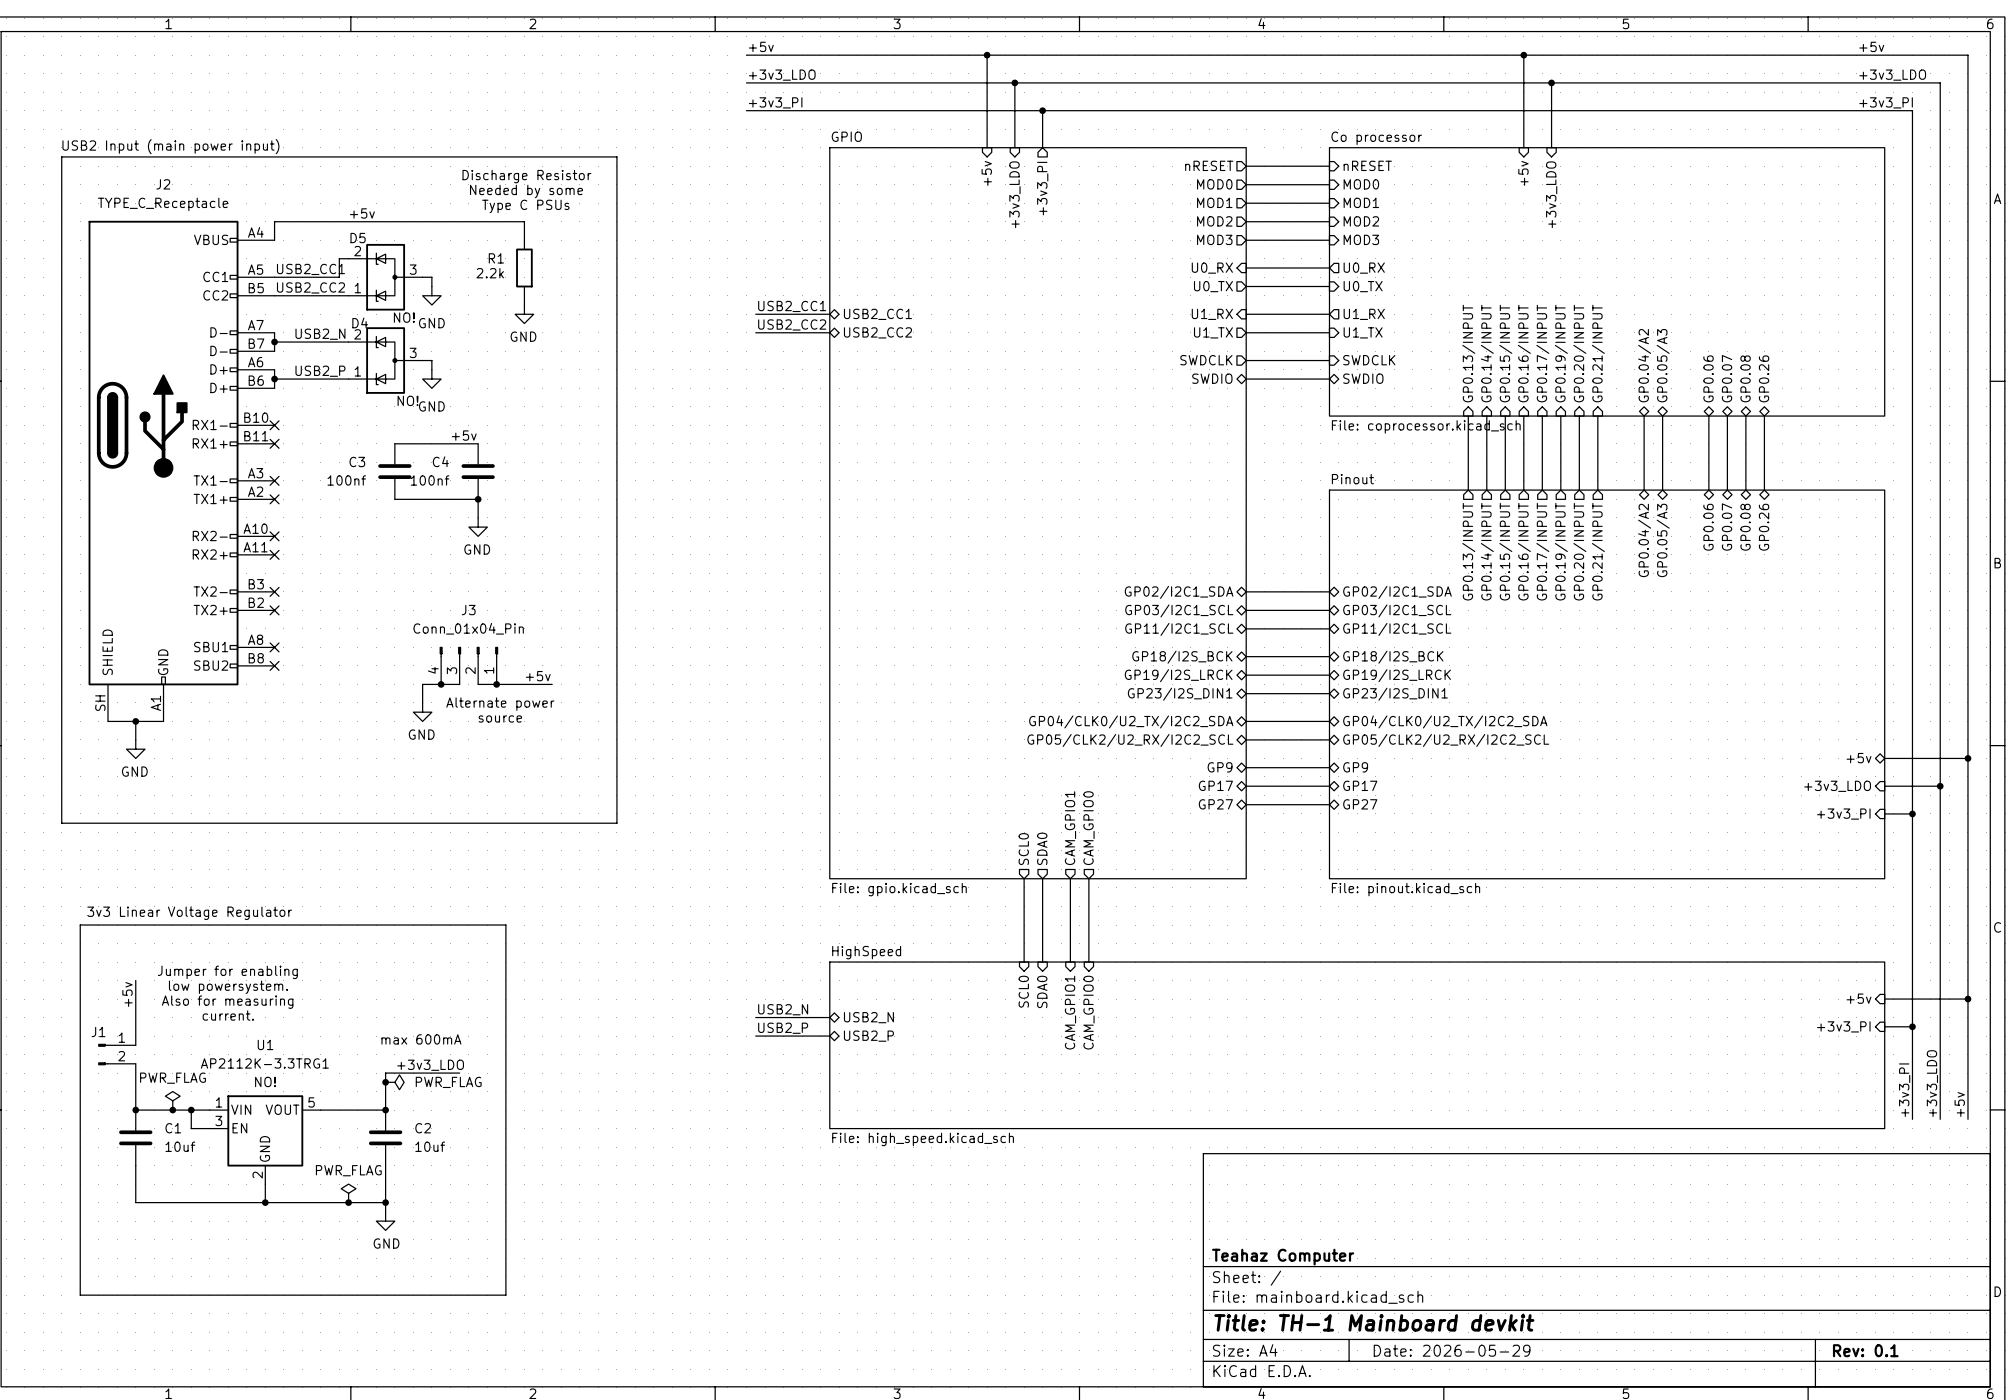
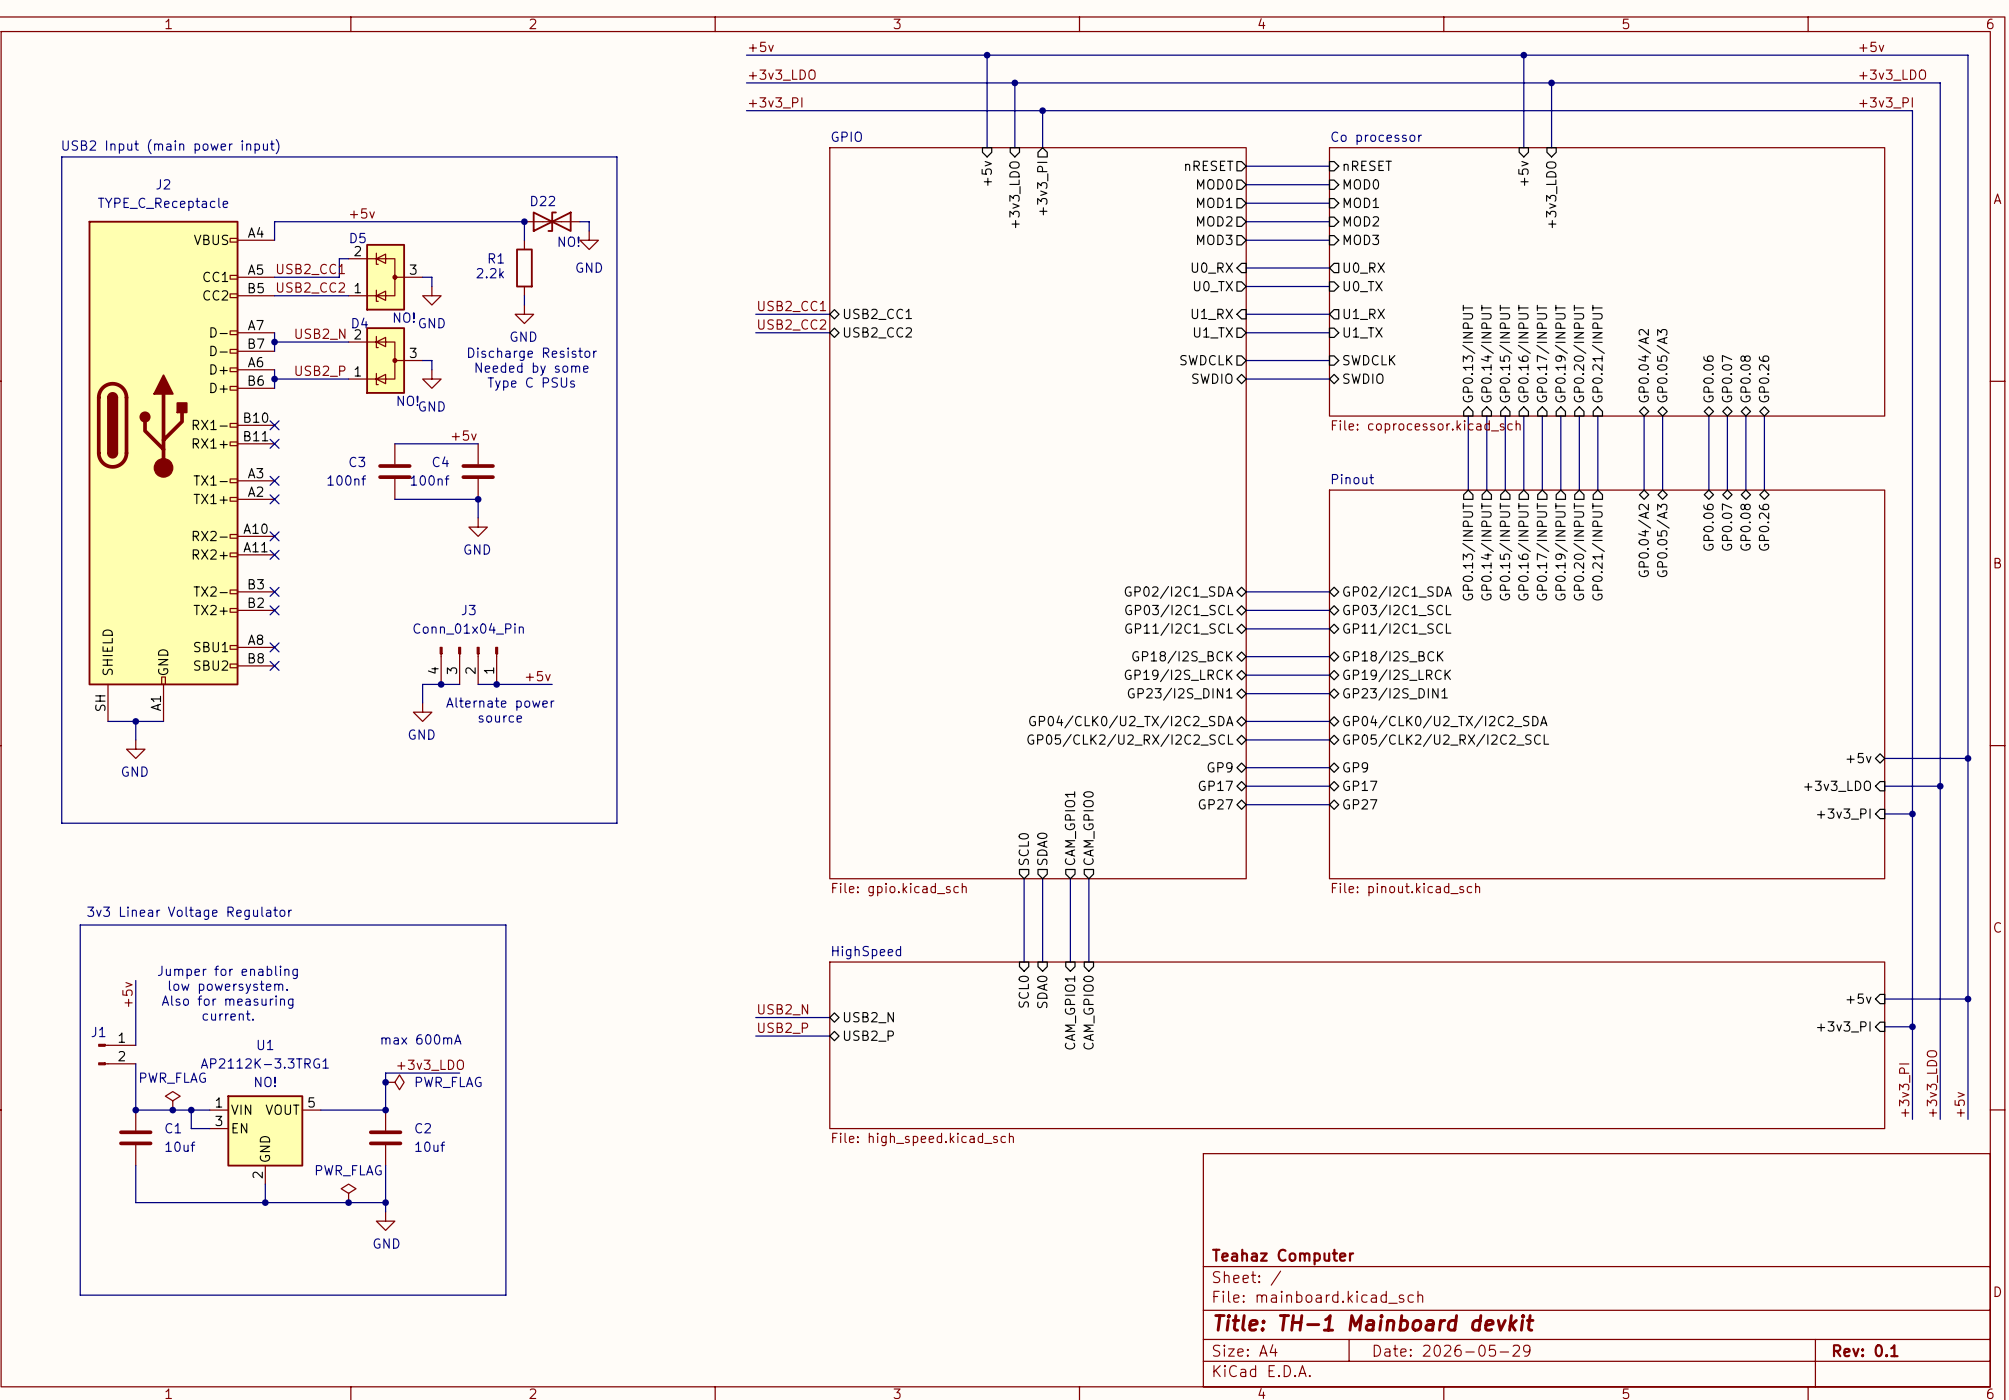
text position: Discharge Resistor (526, 176) -> Discharge Resistor (532, 354)
text position: Needed by some (526, 191) -> Needed by some (532, 369)
text position: Type C PSUs (525, 206) -> Type C PSUs (531, 384)
junction: none -> (524, 221)
D22: none -> (552, 221)
wire: none -> (579, 221) (589, 221) (589, 230)
power symbol: none -> GND (589, 240)

